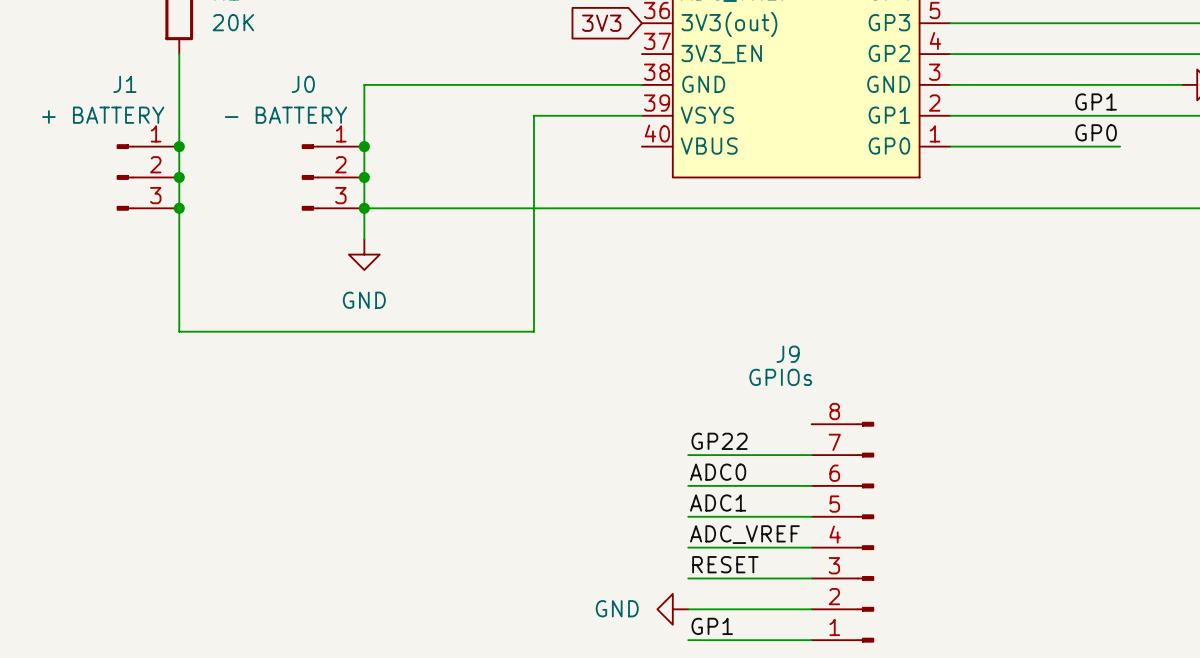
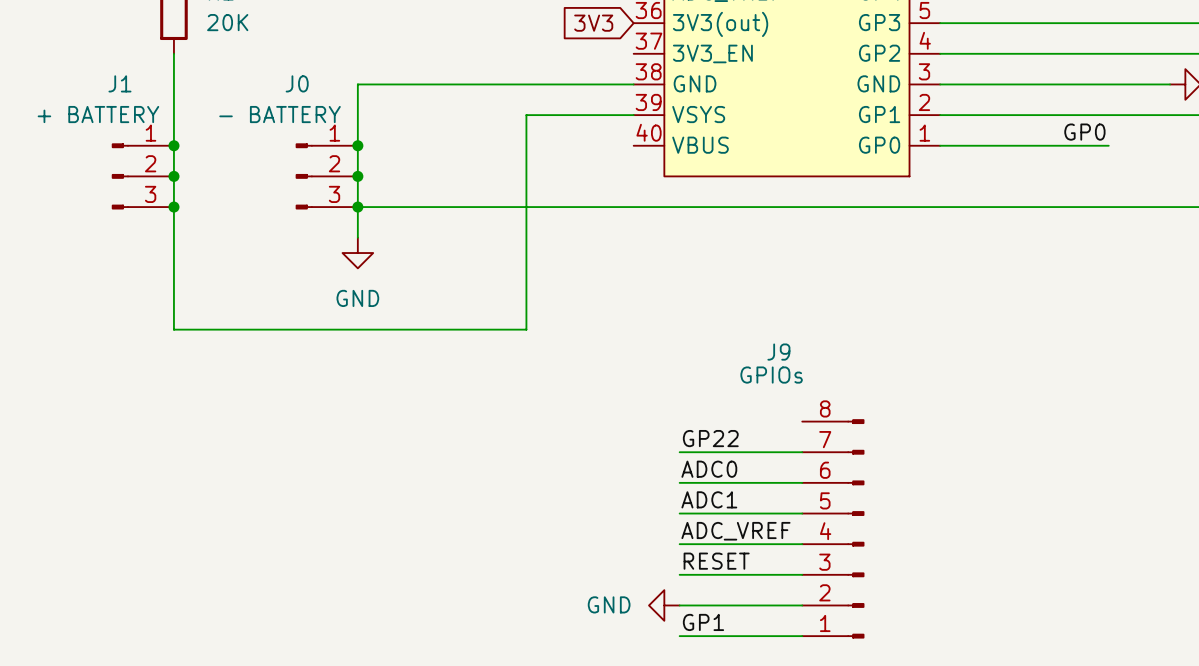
label: GP1 (1096, 102) -> none

